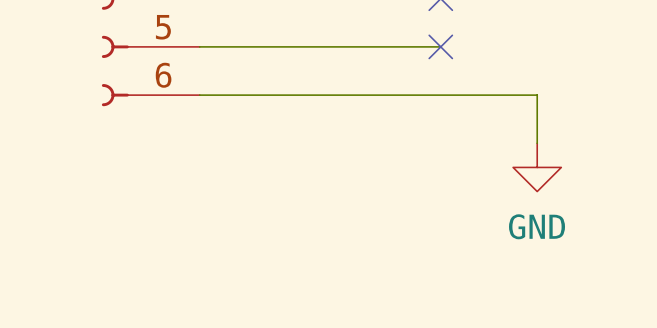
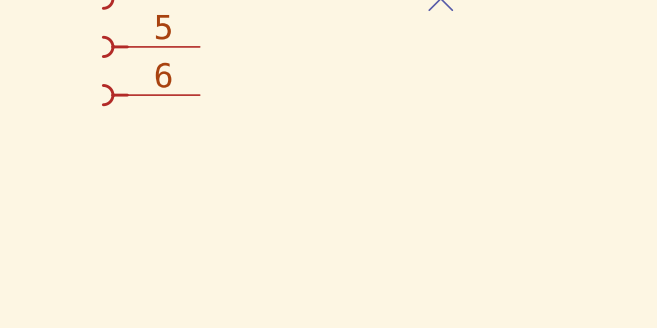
wire: (199, 46) (440, 46) -> none
no-connect mark: (440, 46) -> none
wire: (199, 95) (537, 95) (537, 143) -> none
power symbol: GND (537, 167) -> none

